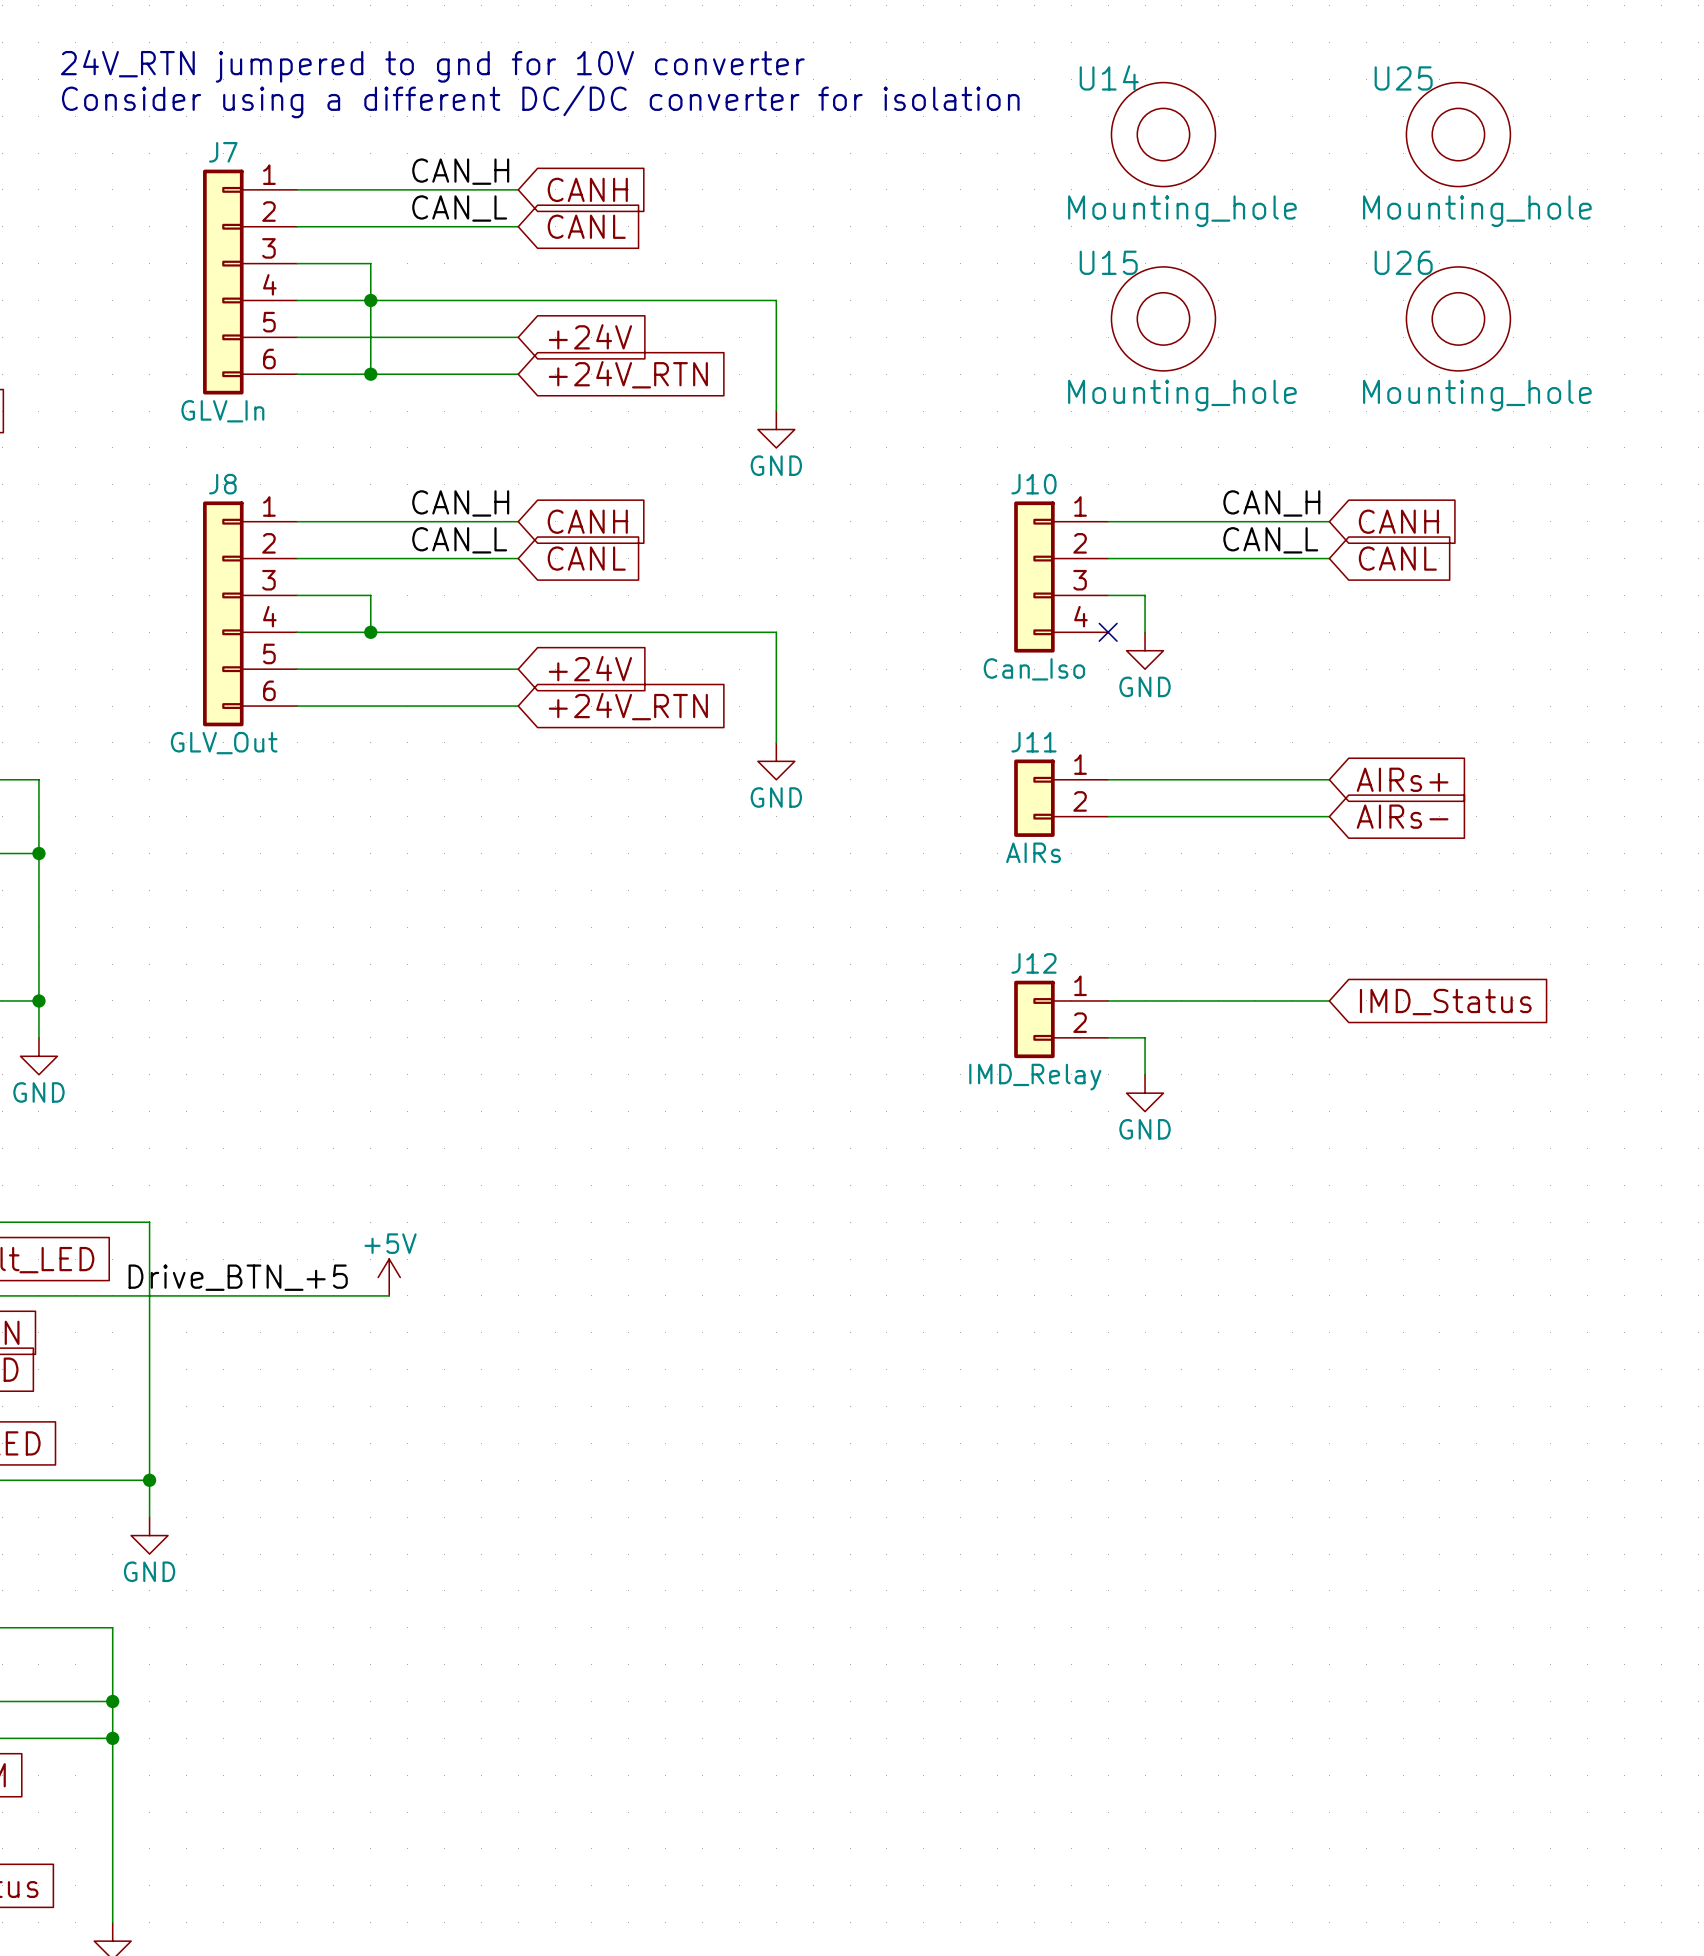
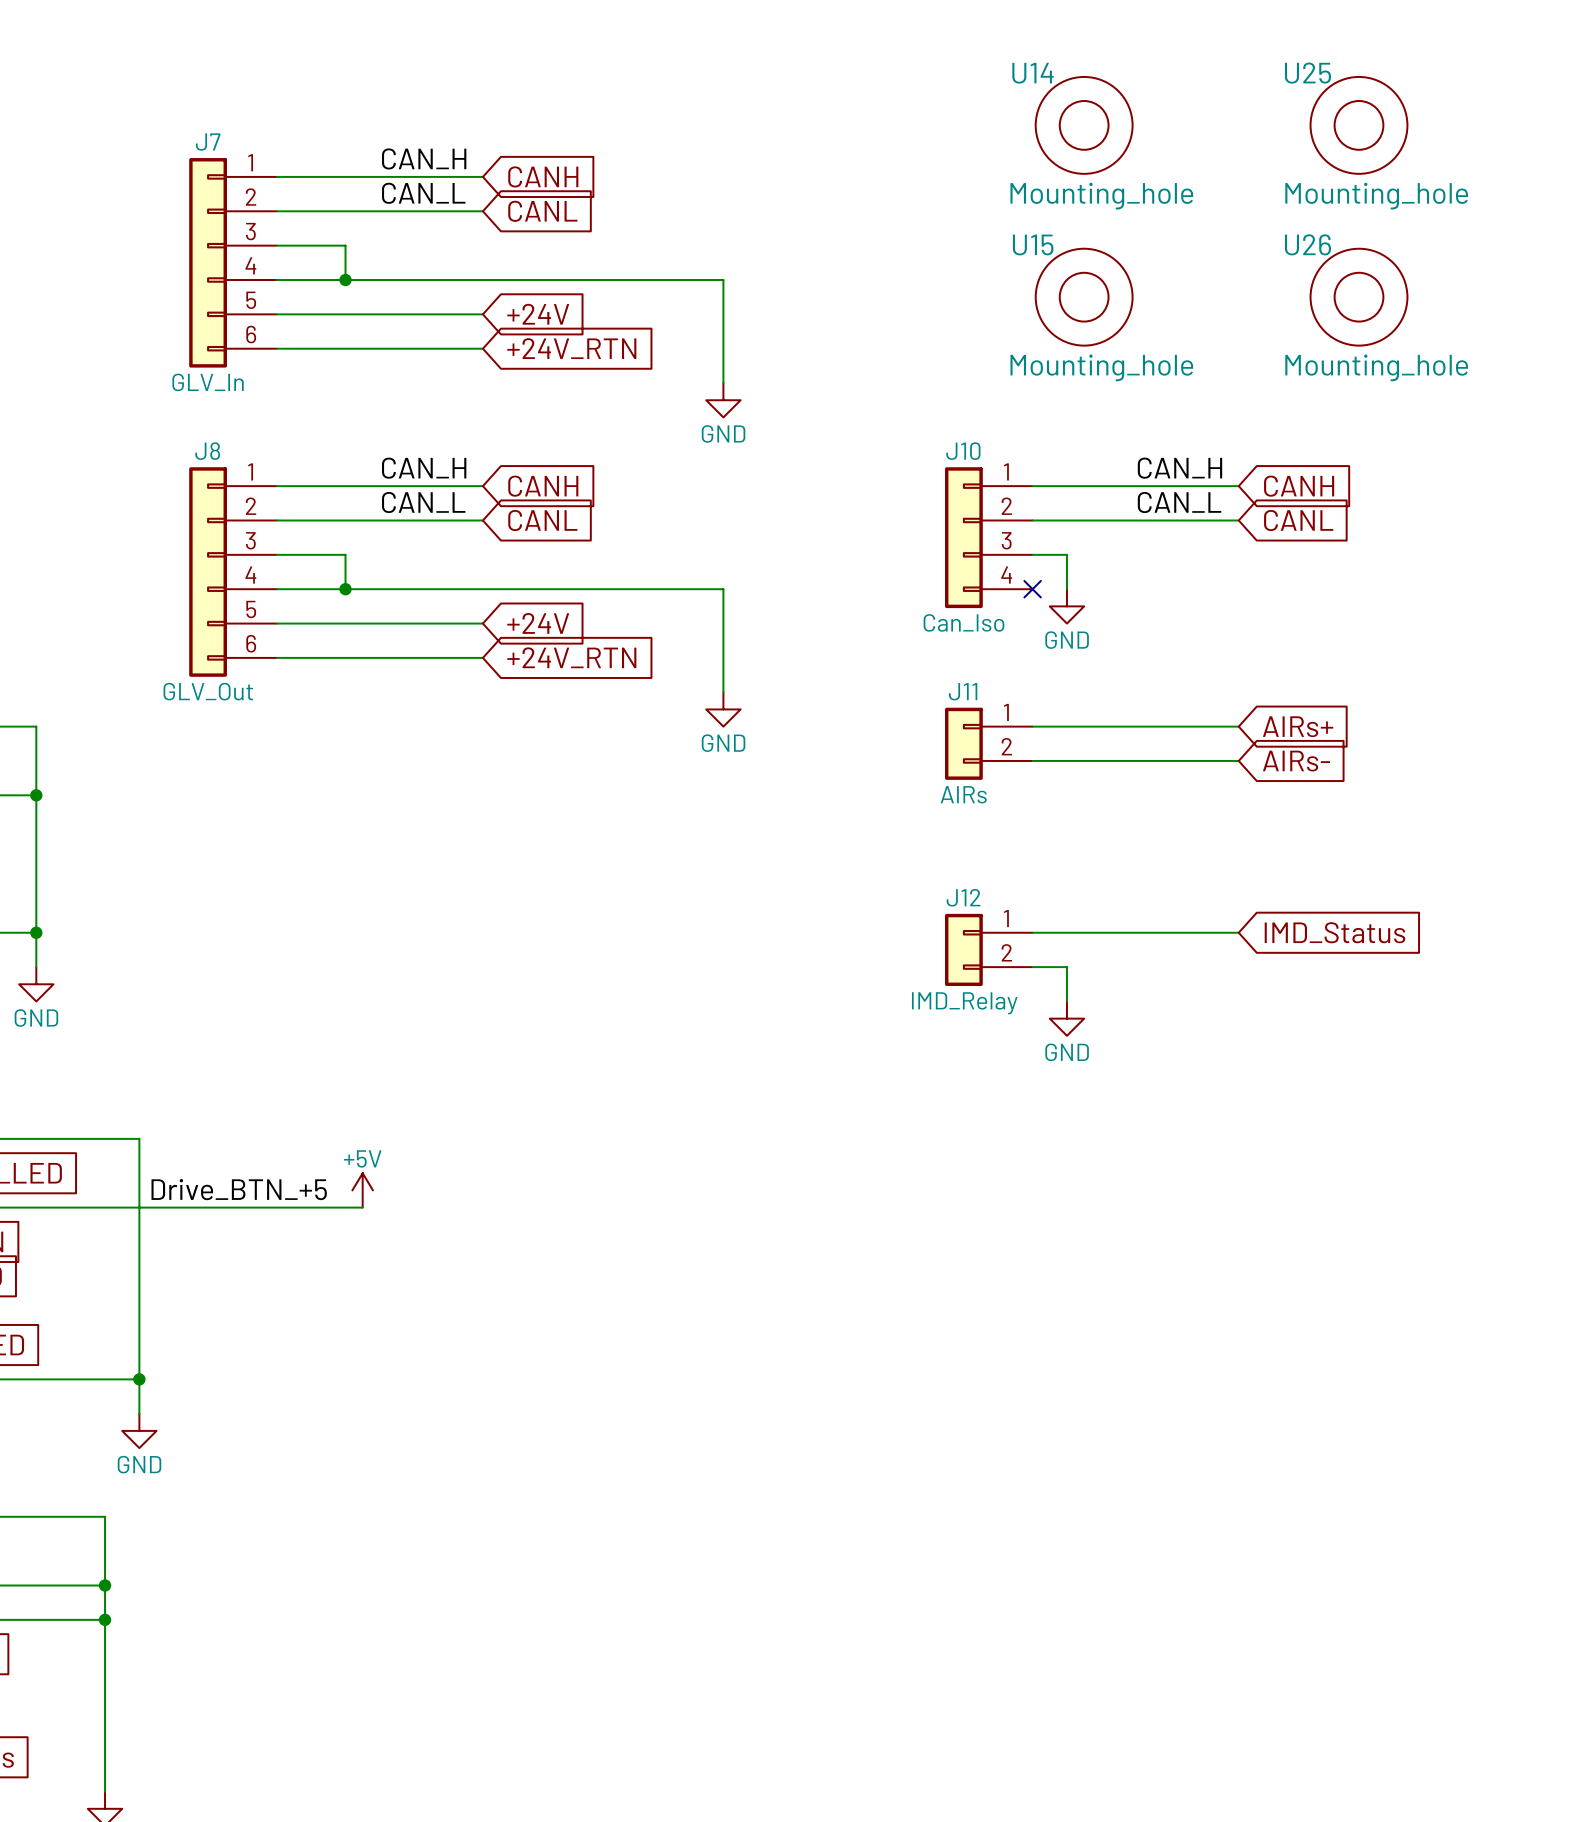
text: 24V_RTN jumpered to gnd for 10V converter (432, 66) -> none
text: Consider using a different DC/DC converter for isolation (540, 101) -> none
wire: (370, 300) (370, 374) -> none
junction: (370, 374) -> none

